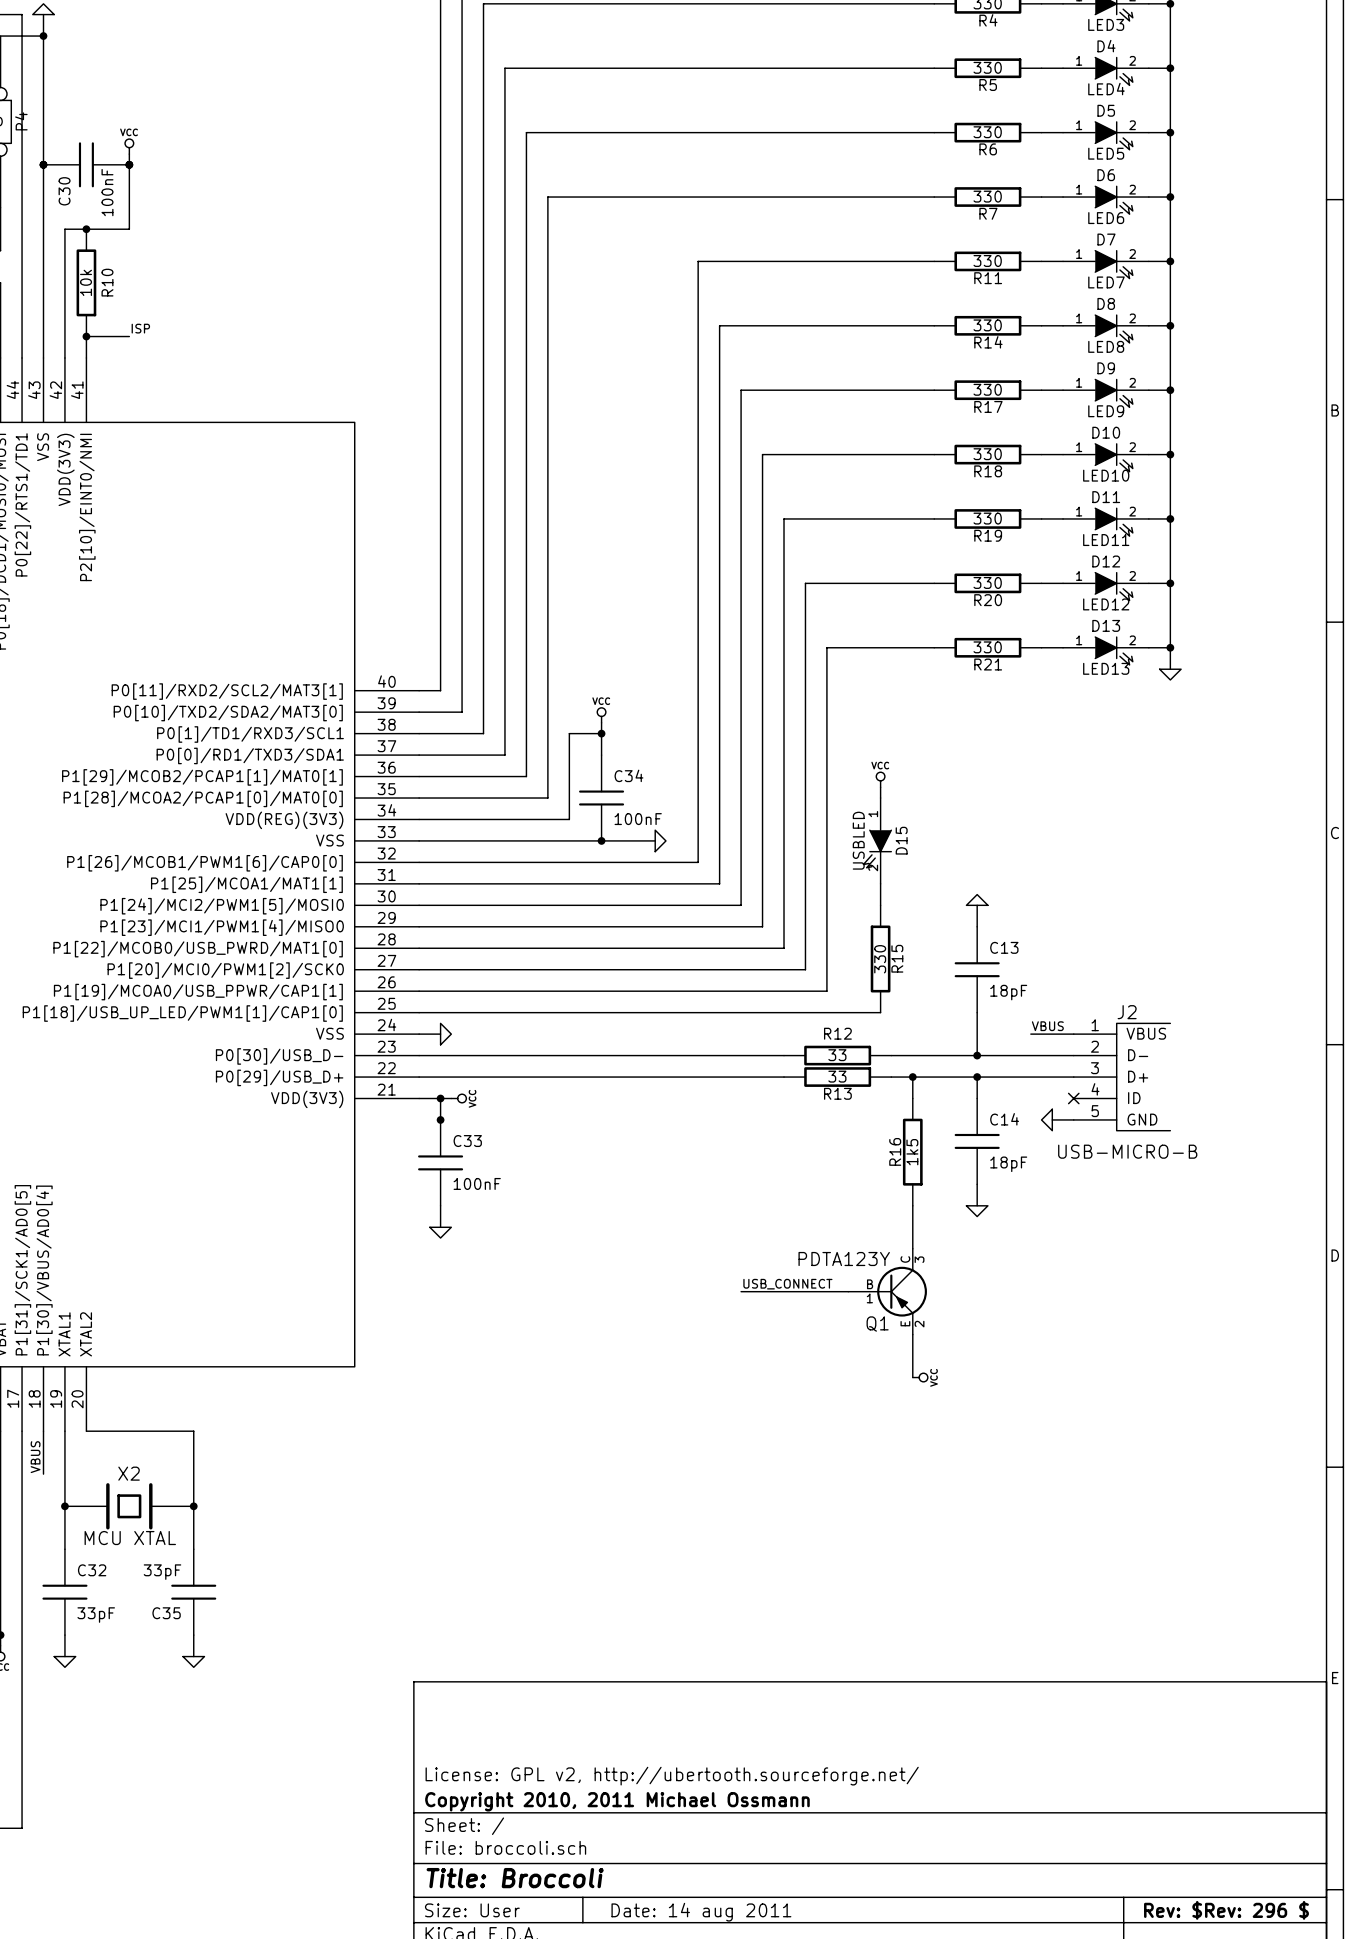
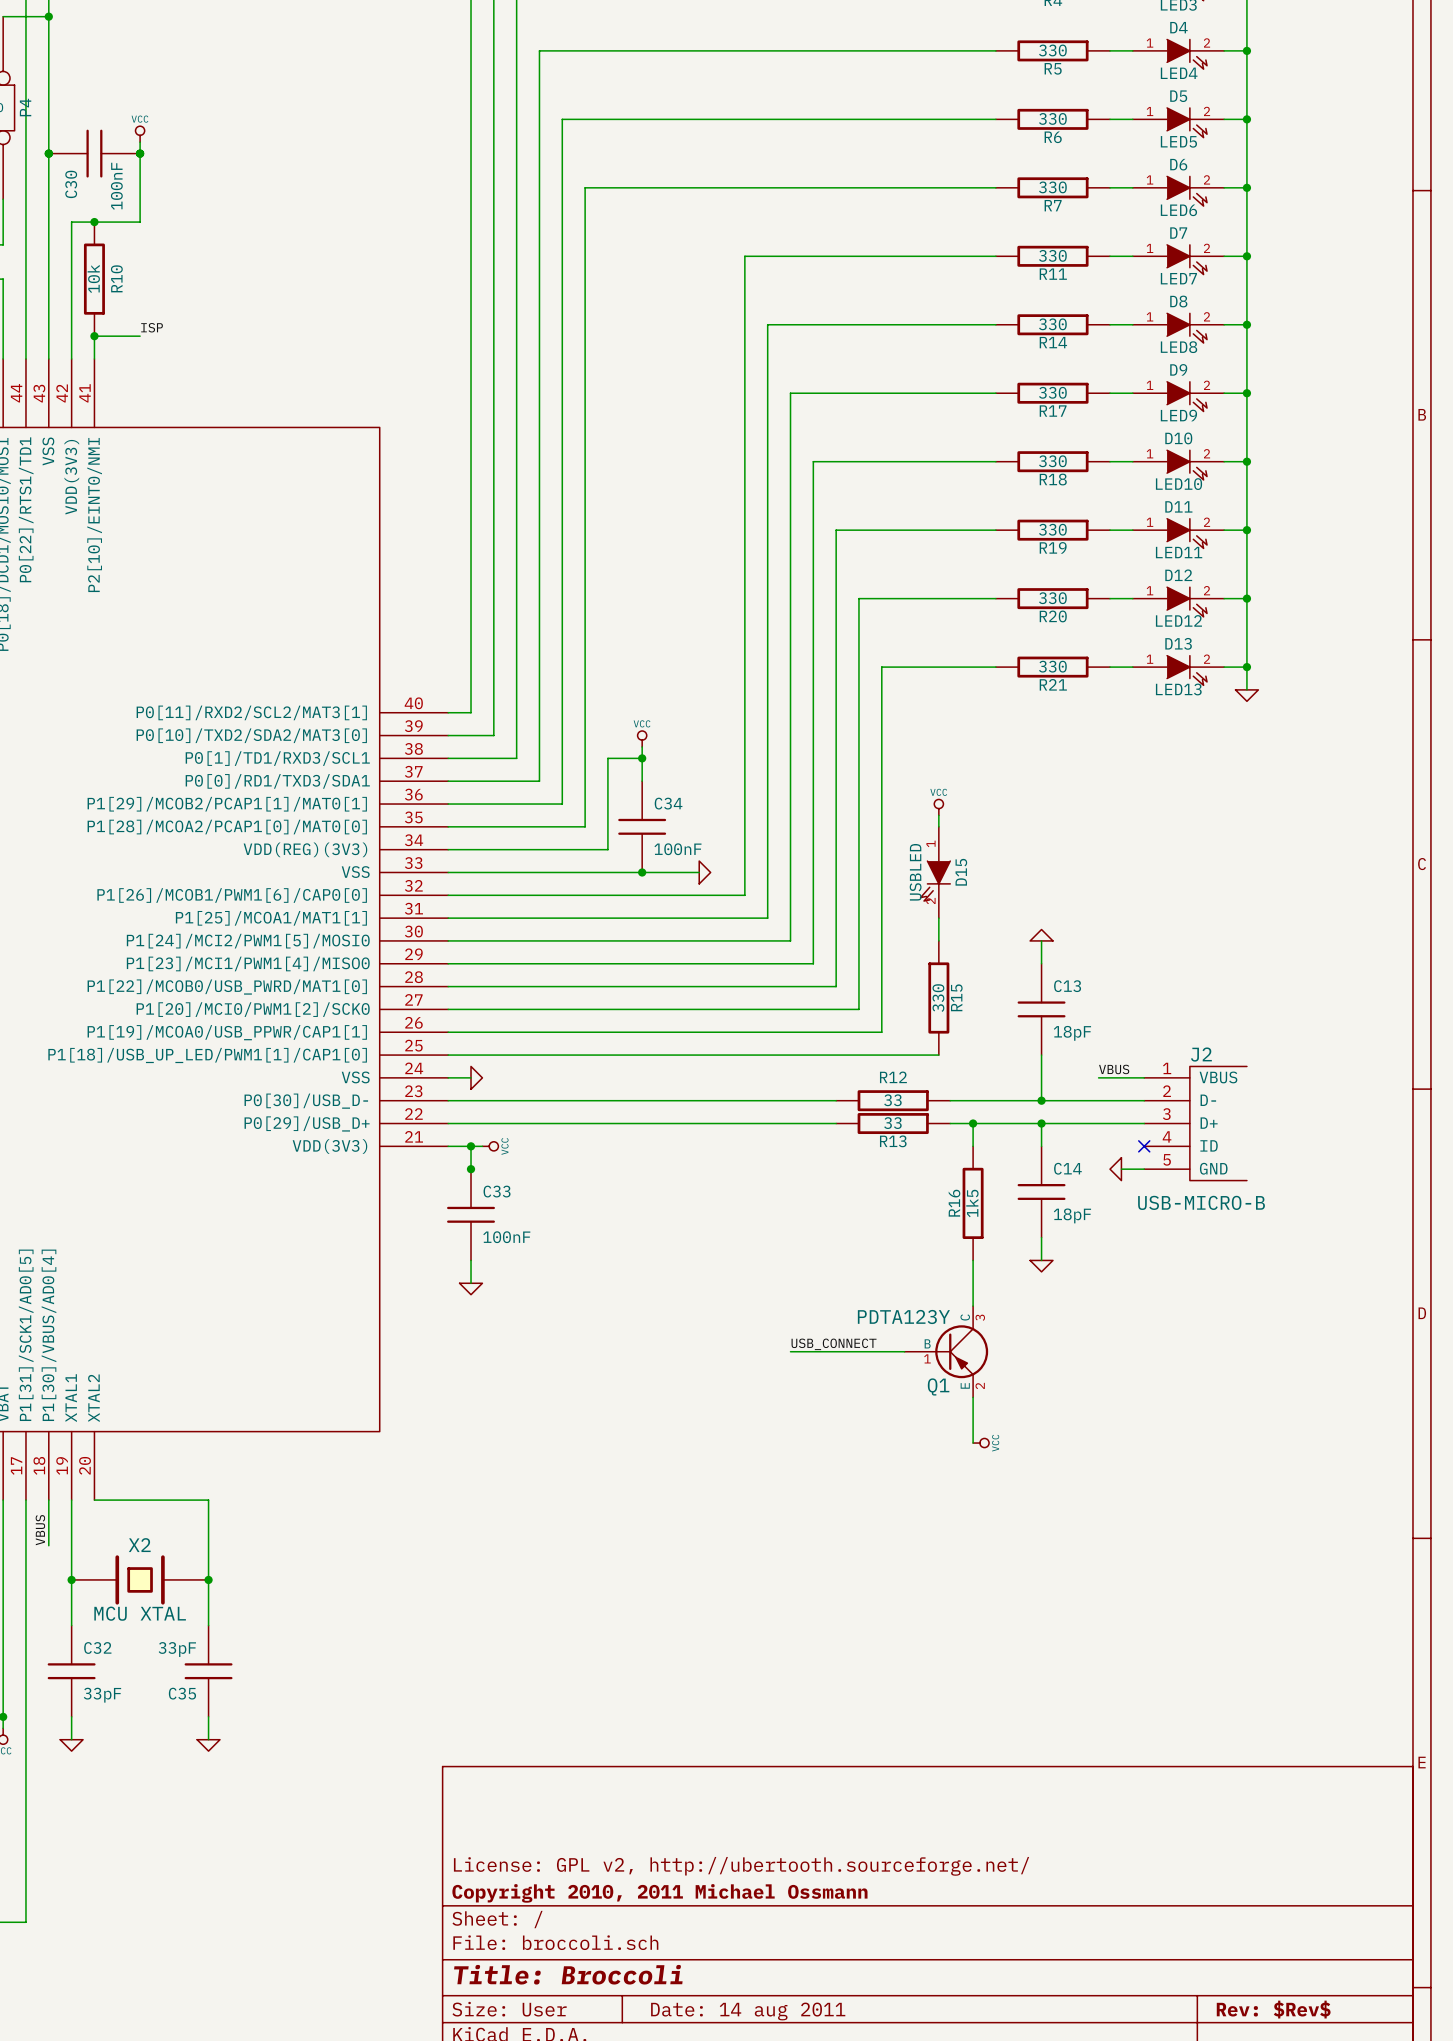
title block: Rev: $Rev: 296 $ (1226, 1910) -> Rev: $Rev$ (1273, 2009)

